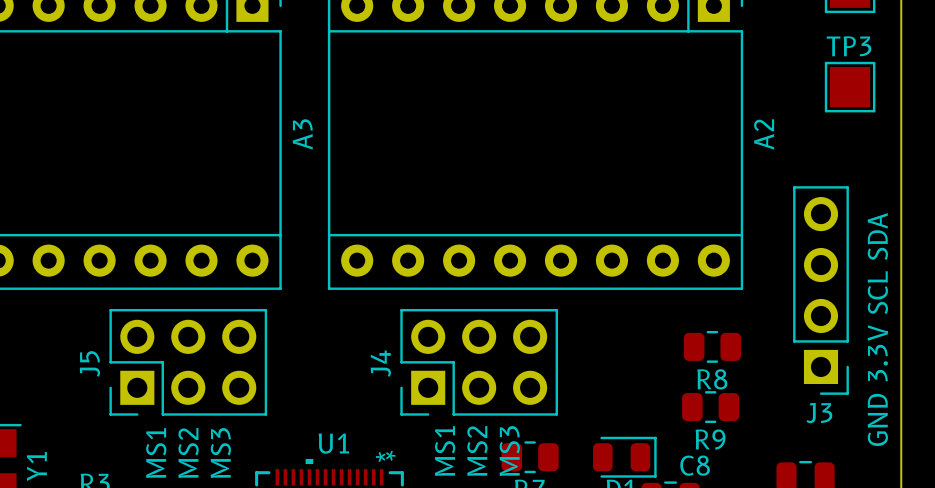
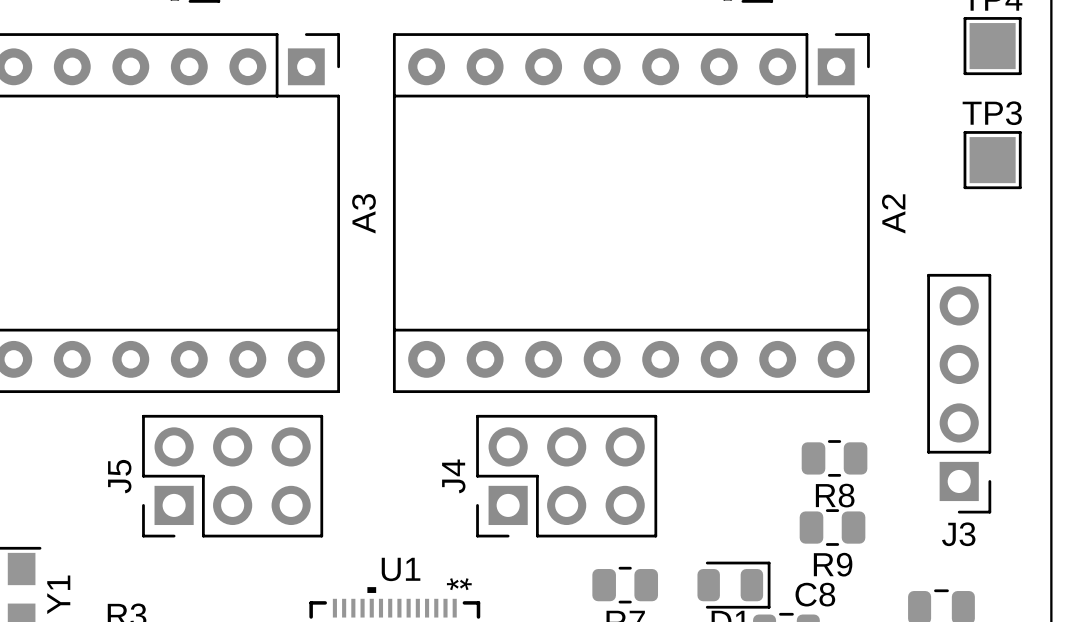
text: GND 3.3V SCL SDA (877, 329) -> none
text: MS1 (445, 451) -> none
text: MS2 (477, 451) -> none
text: MS3 (509, 451) -> none
text: MS1 (156, 453) -> none
text: MS2 (188, 453) -> none
text: MS3 (220, 453) -> none

